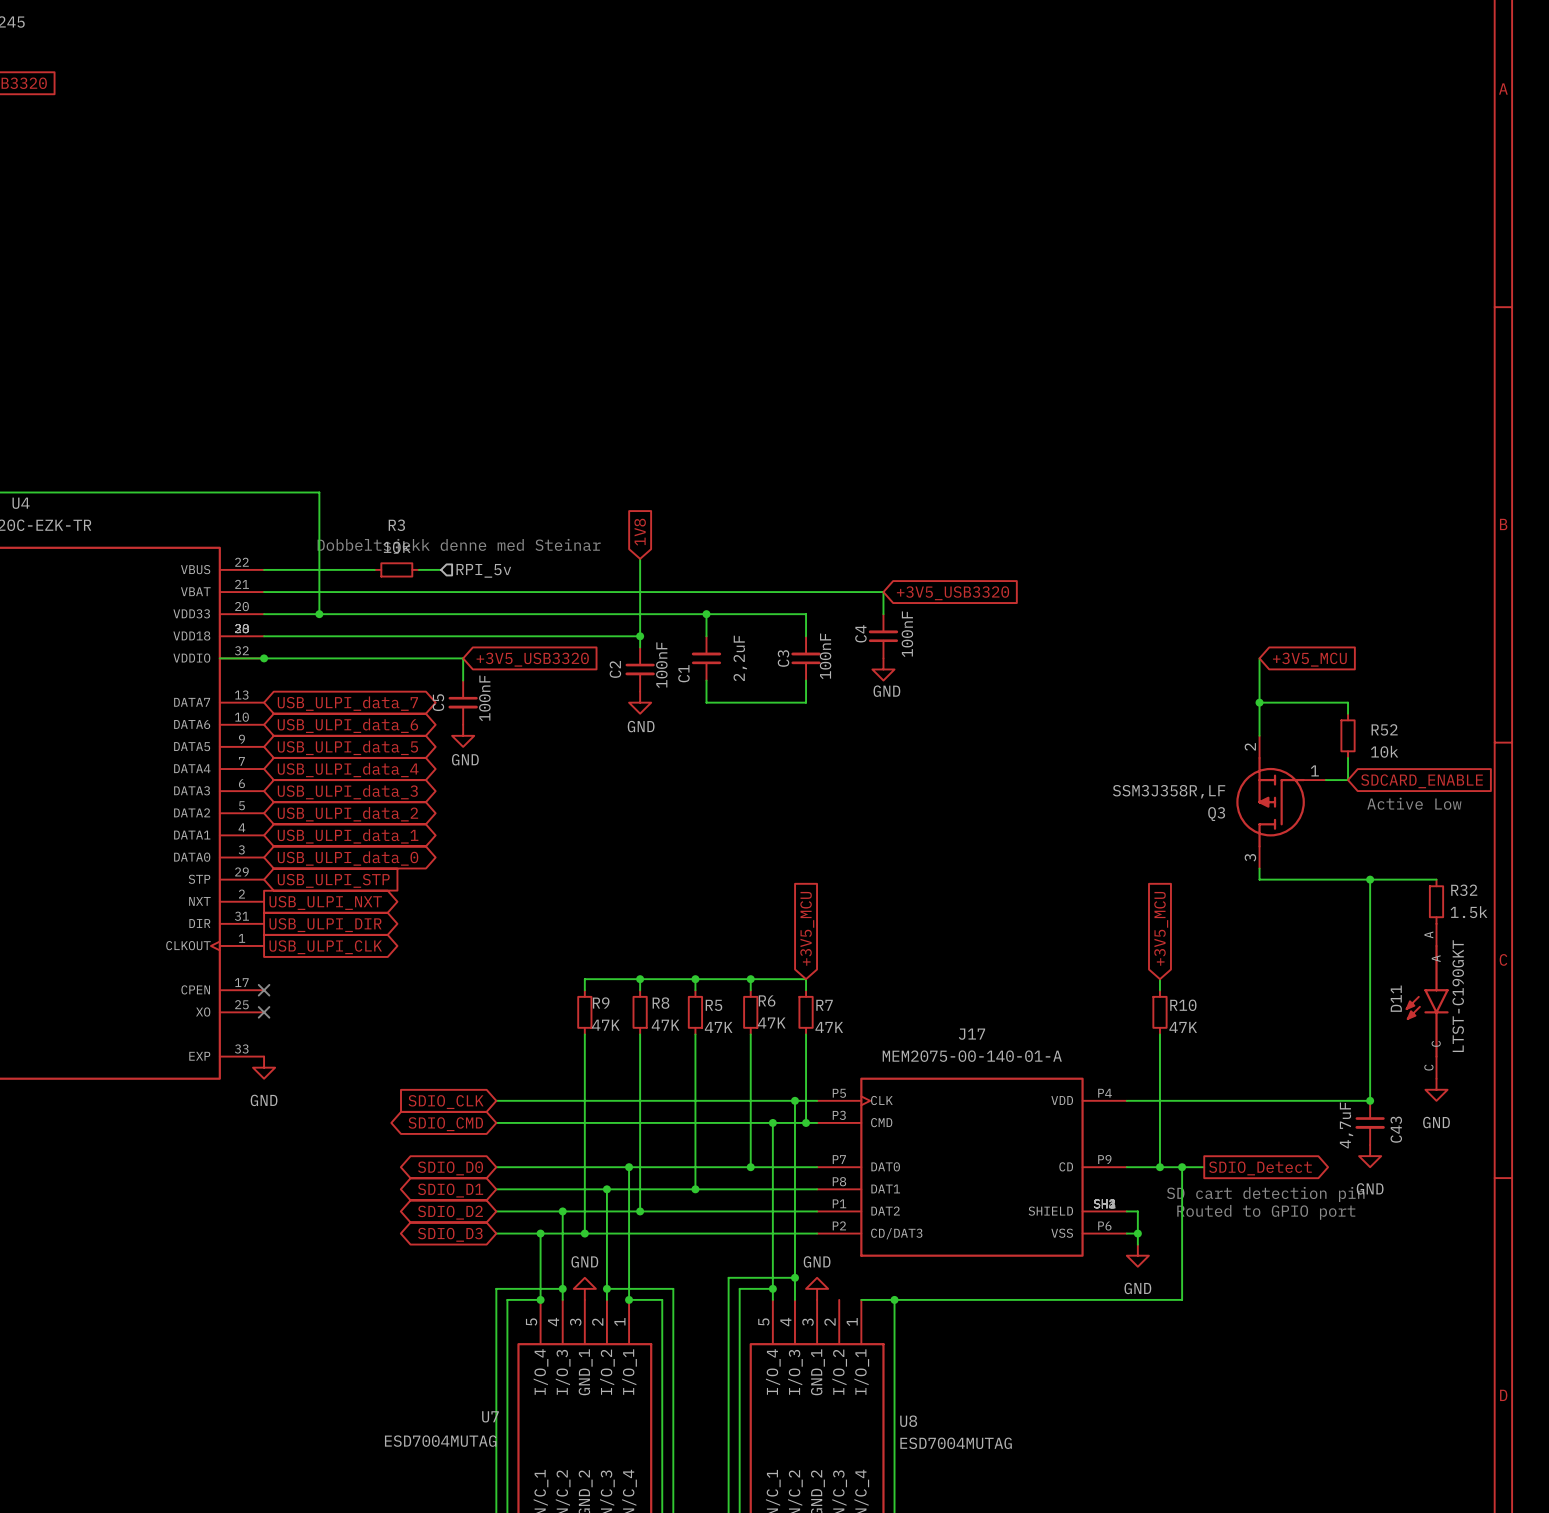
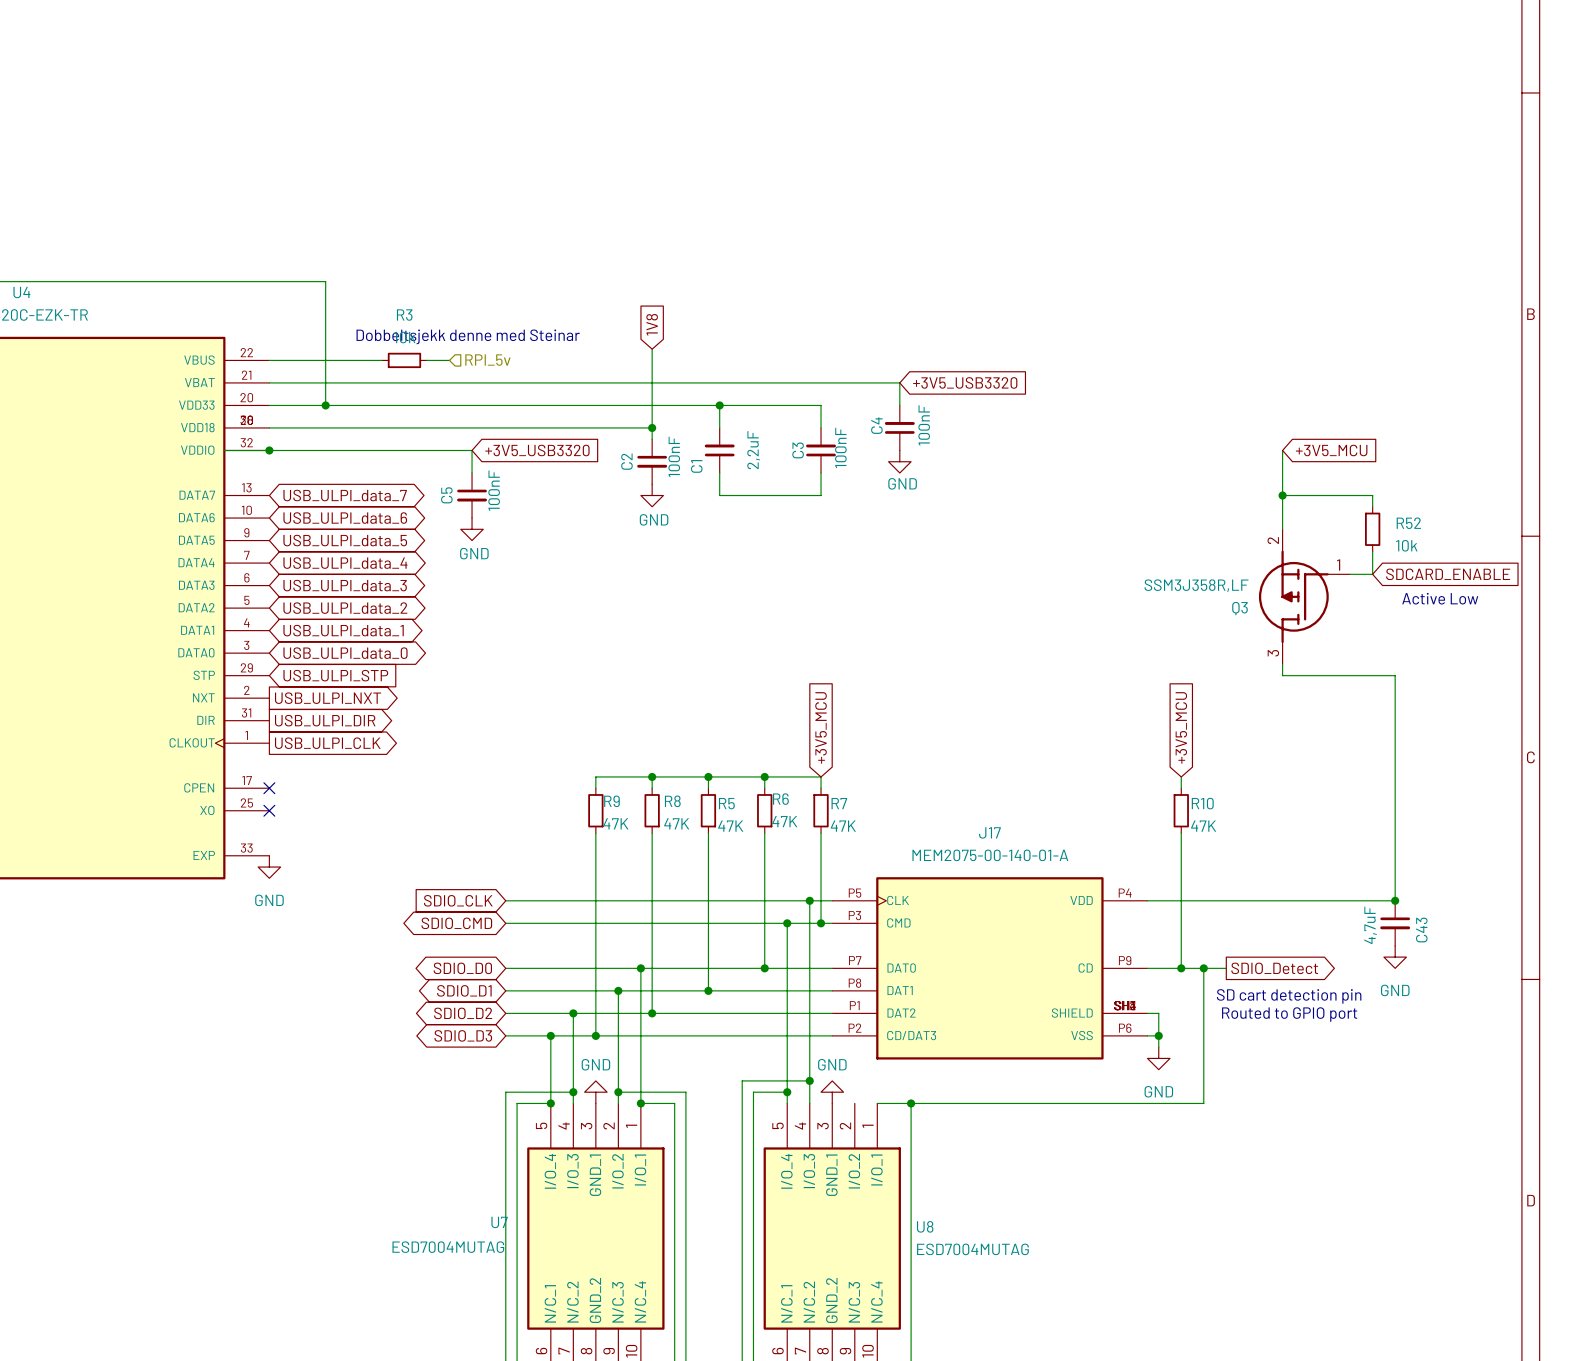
wire: (1370, 879) (1436, 879) -> none
junction: (1370, 879) -> none
R32: 1.5k (1436, 901) -> none
D11: LTST-C190GKT (1427, 1001) -> none
power symbol: GND (1436, 1089) -> none

